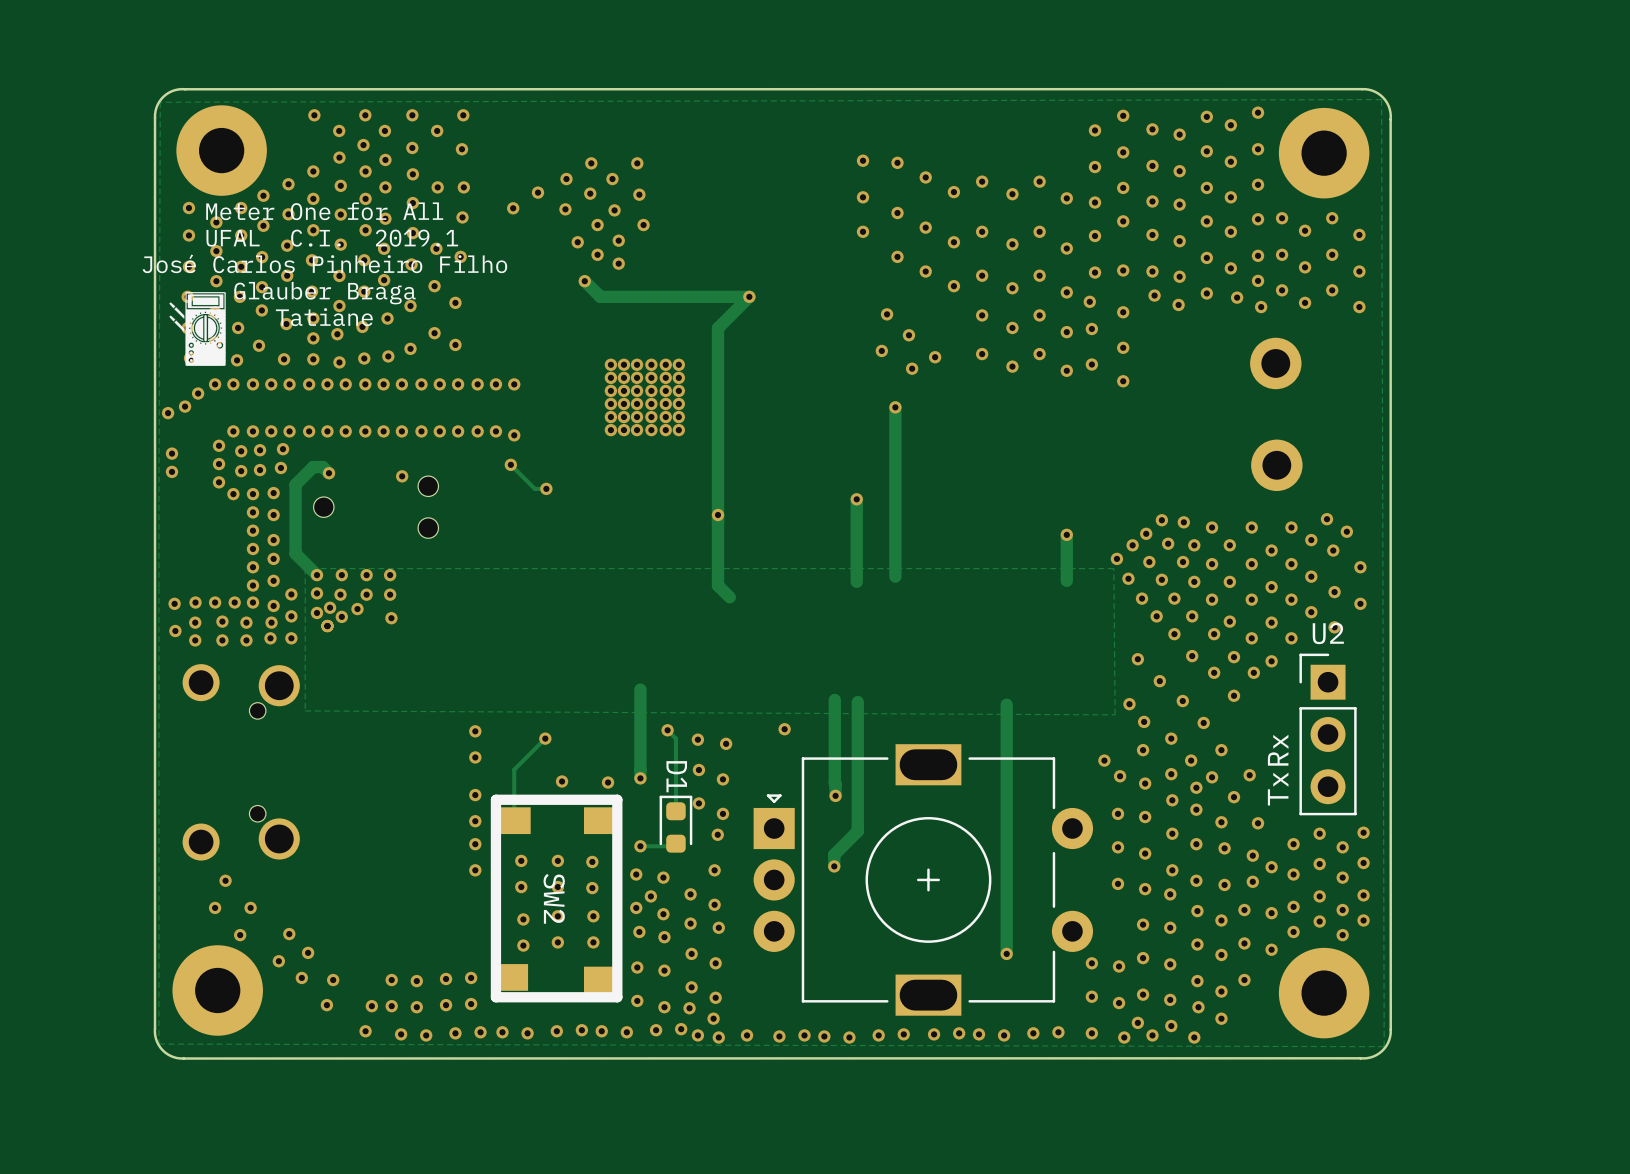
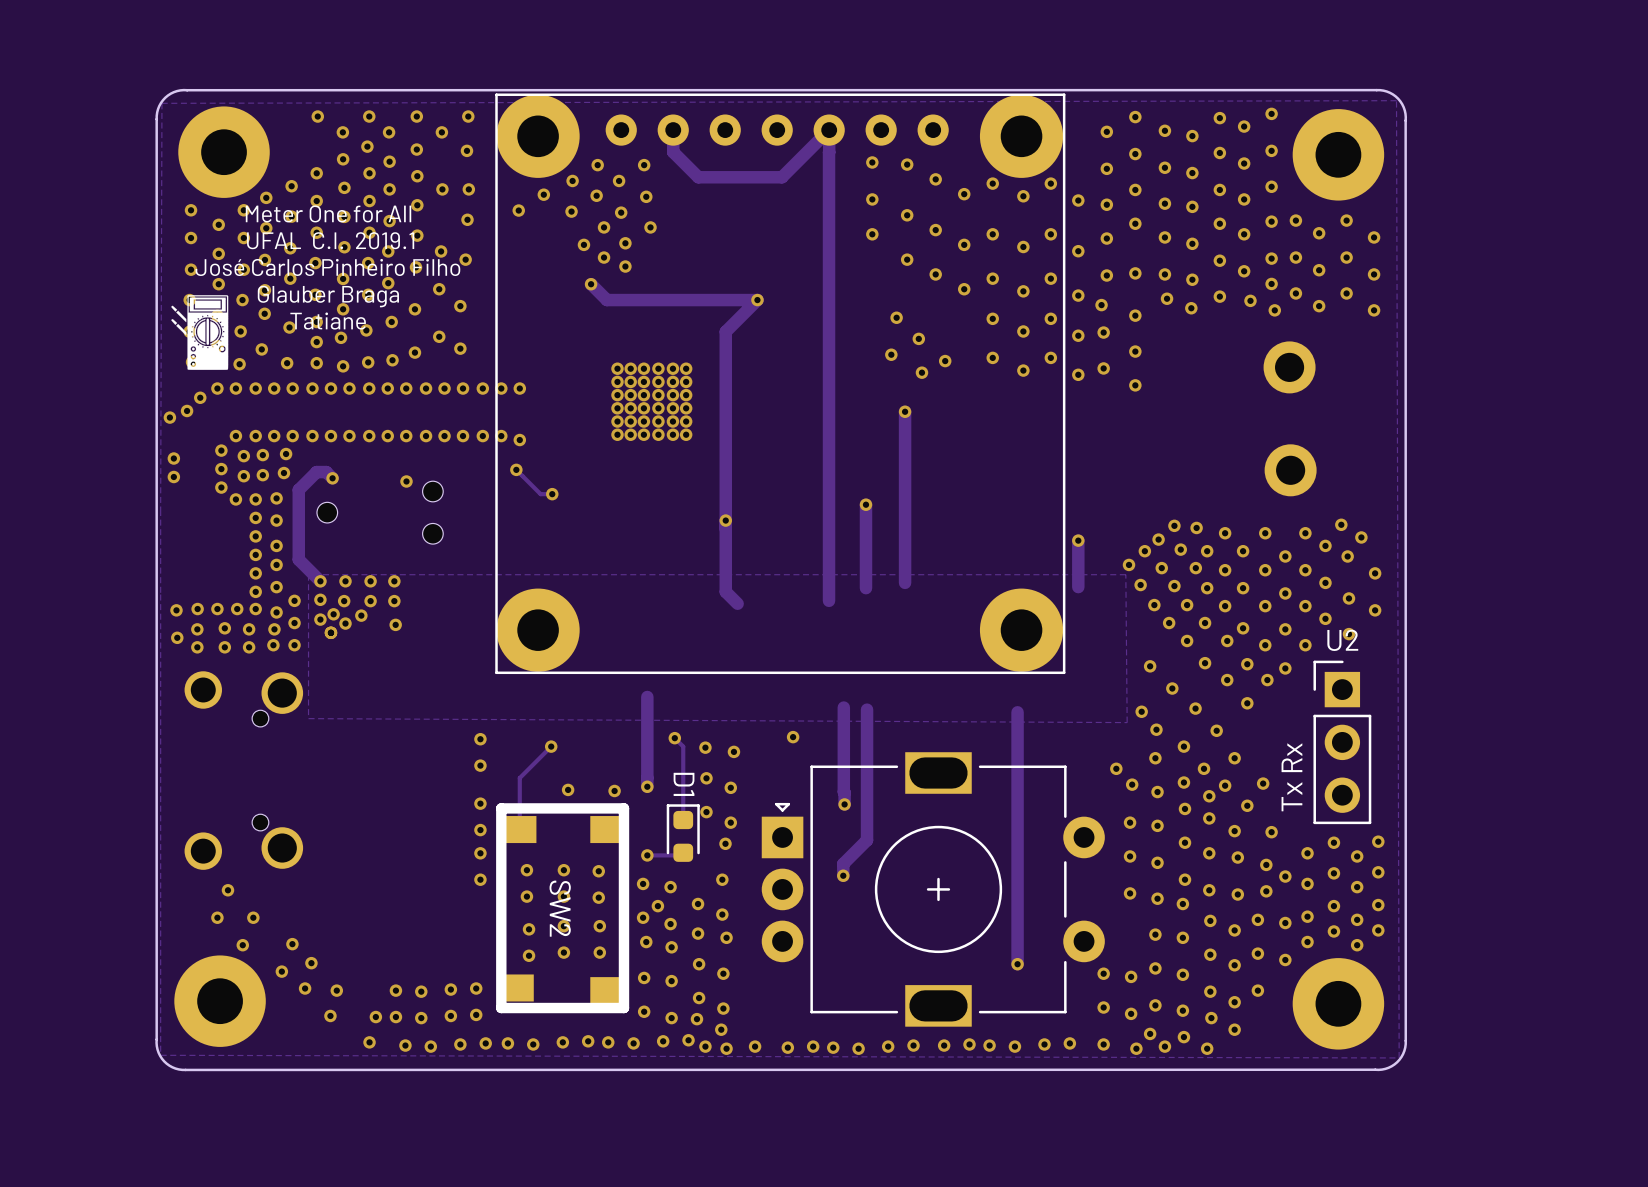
track: none -> (673, 130) (673, 152) (698, 177) (782, 177) (829, 130) (829, 152)
track: none -> (829, 152) (829, 600)
part: none -> (780, 383)

